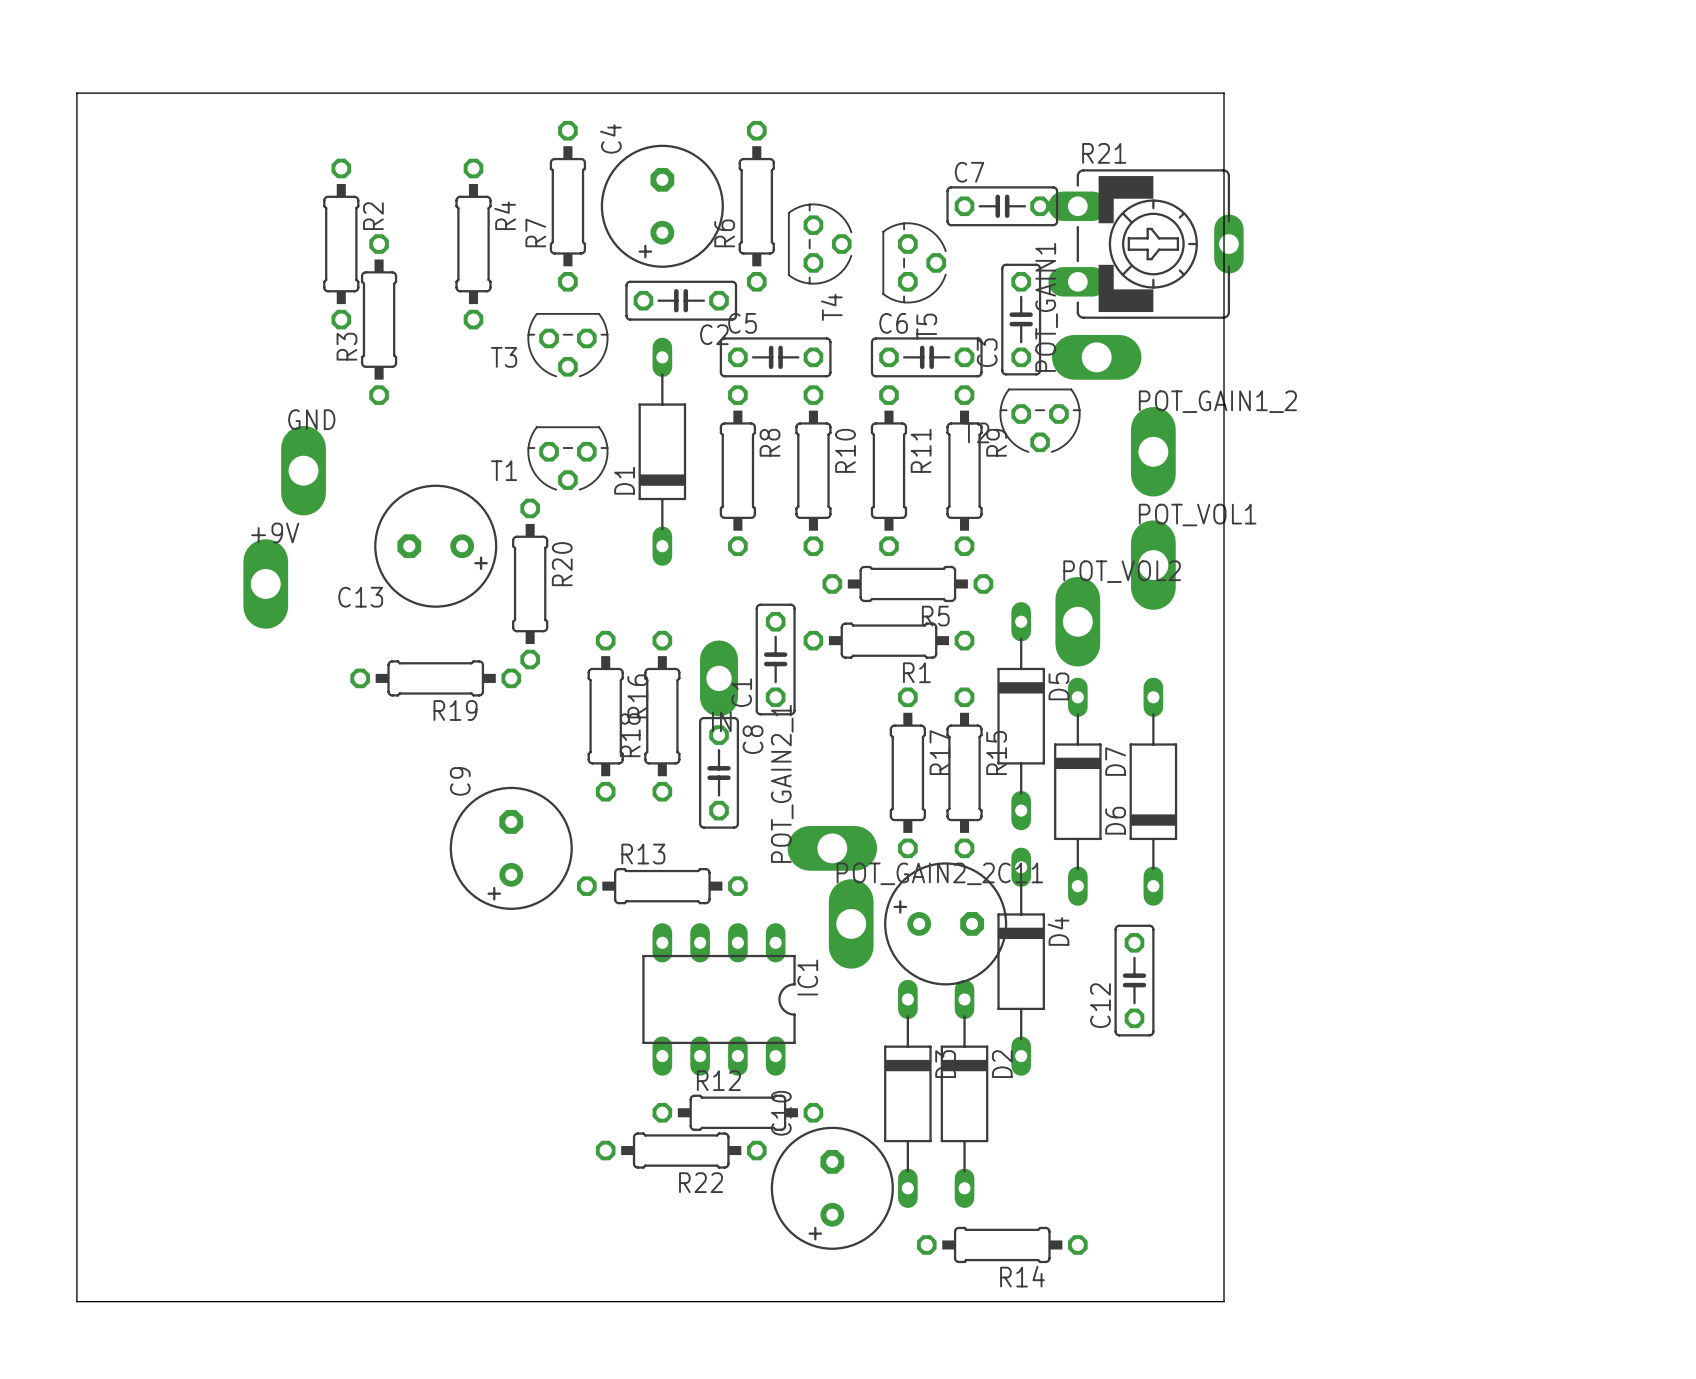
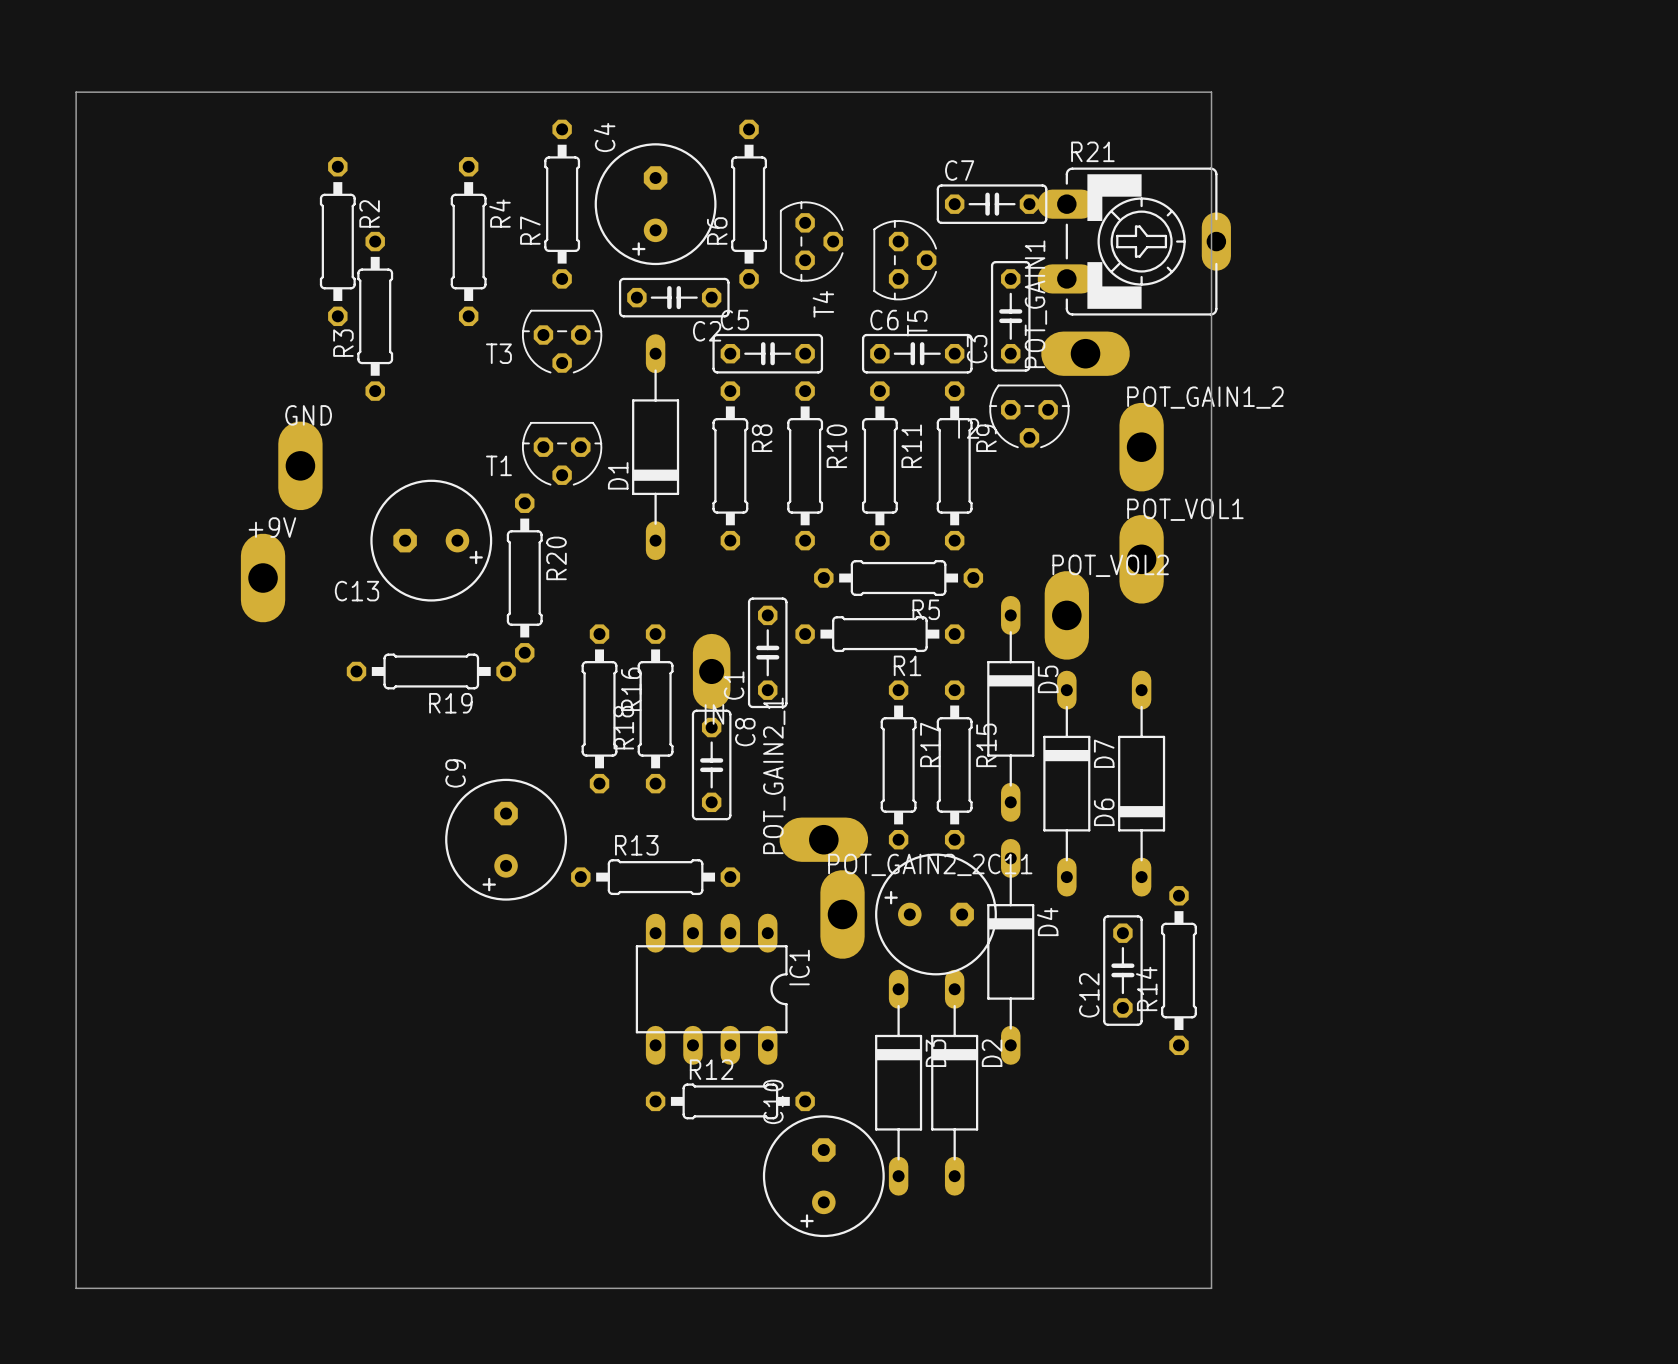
R22: (681, 1150) -> none
R14 rotation: 0° (1002, 1244) -> 90° clockwise (1178, 970)
R14 position: (1002, 1244) -> (1178, 970)

